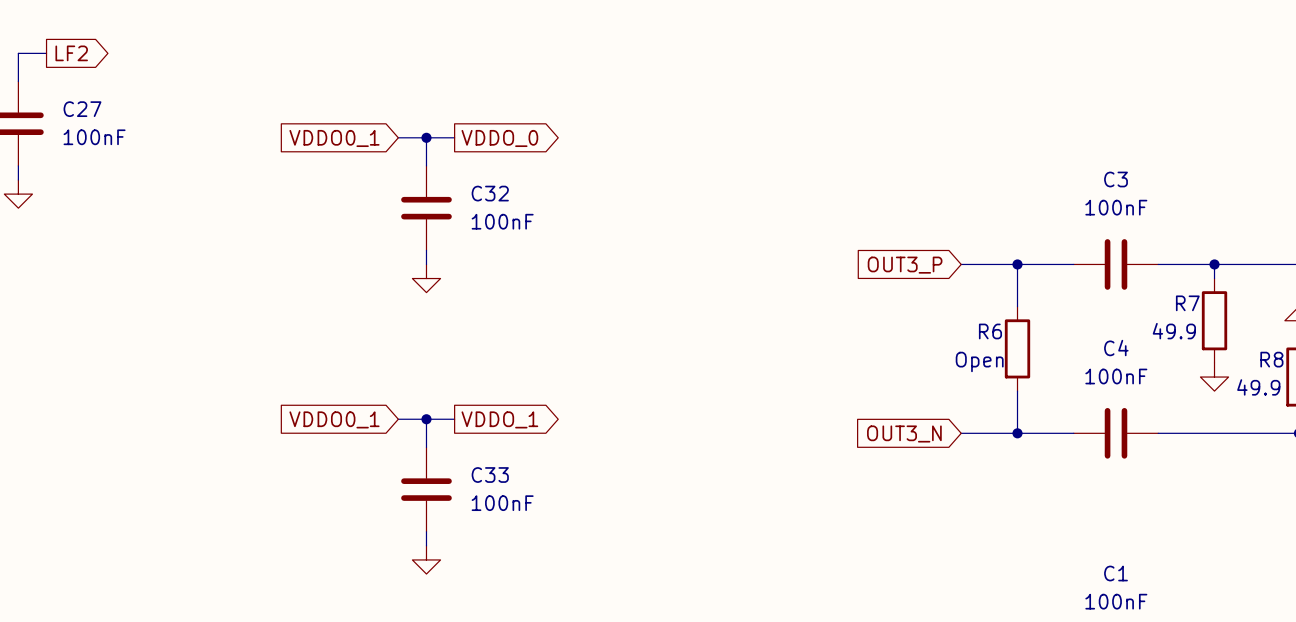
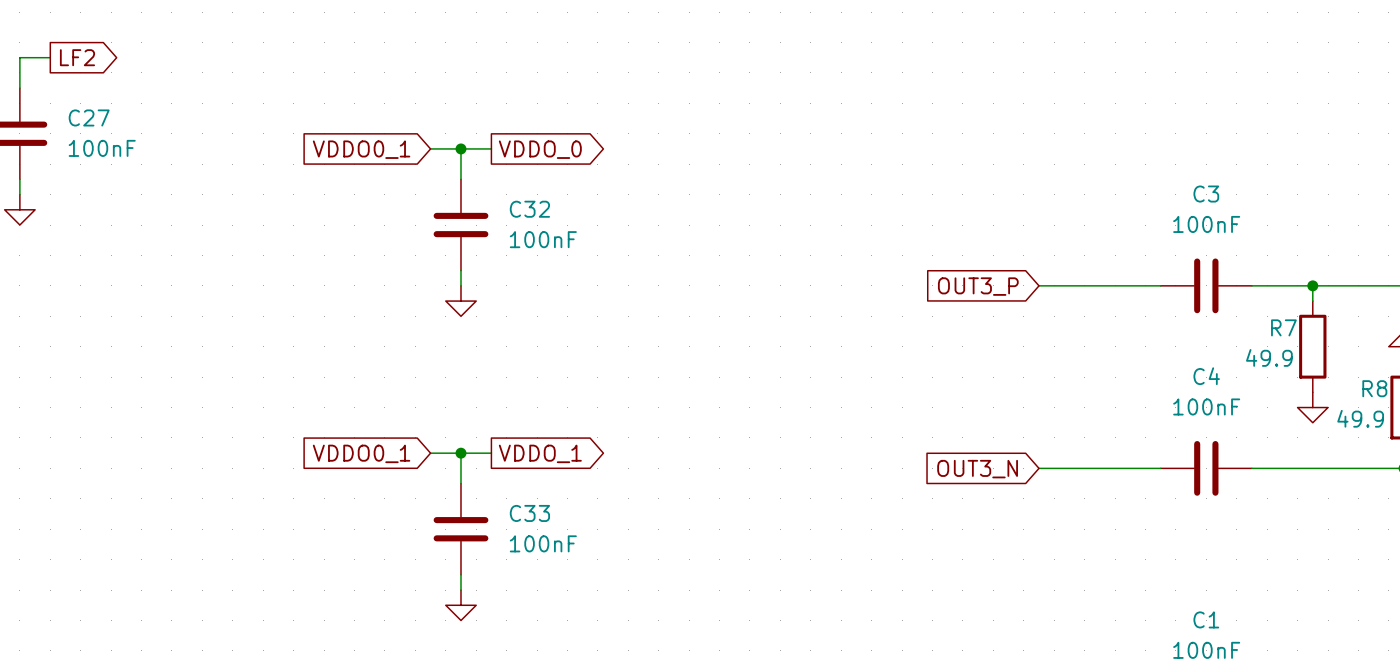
wire: (1017, 264) (1017, 306) -> none
junction: (1017, 264) -> none
R6: Open (1017, 348) -> none
wire: (1017, 391) (1017, 433) -> none
junction: (1017, 433) -> none

